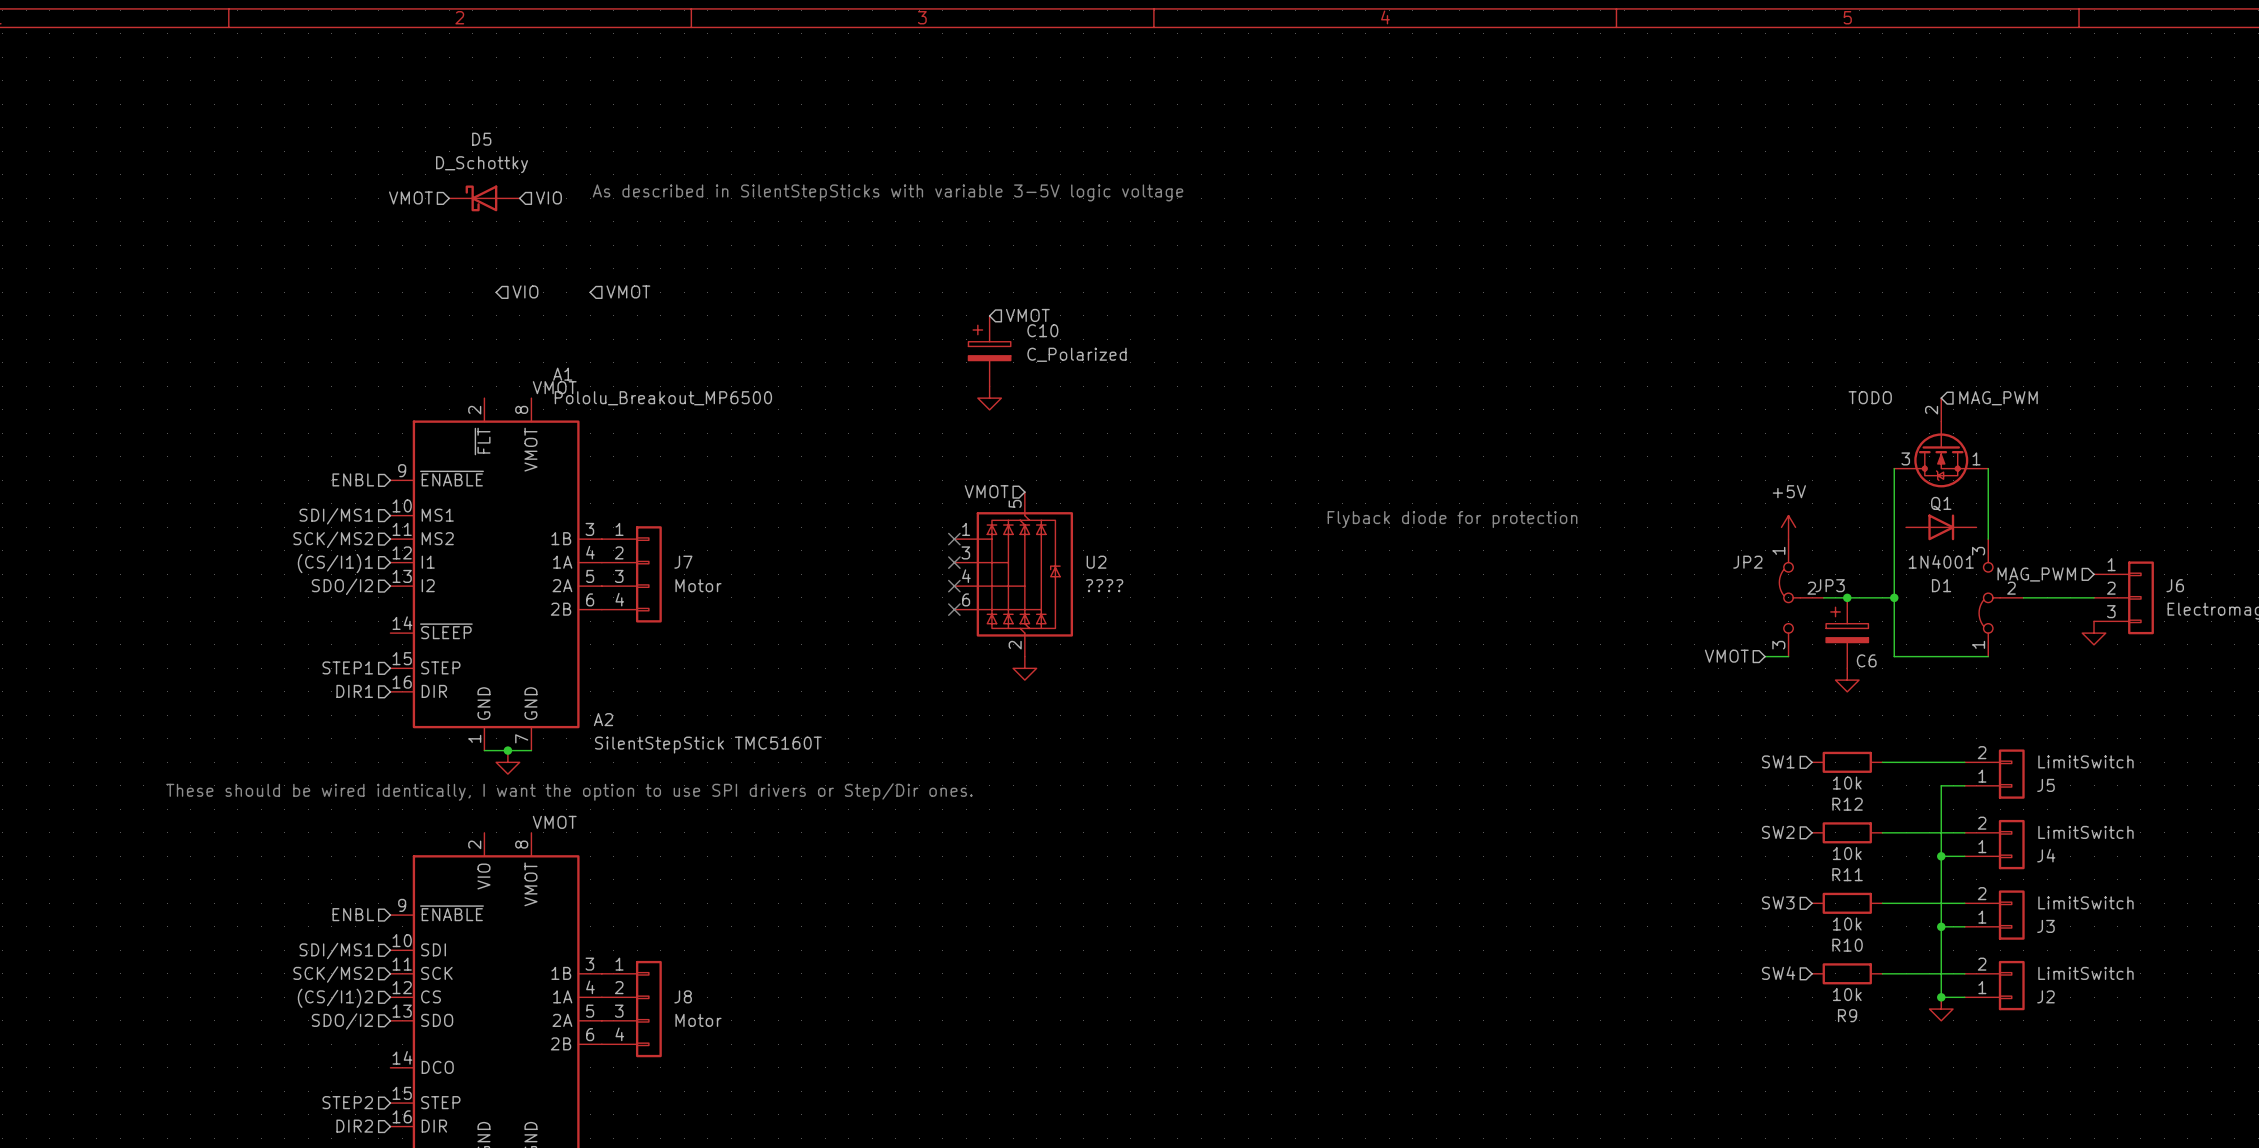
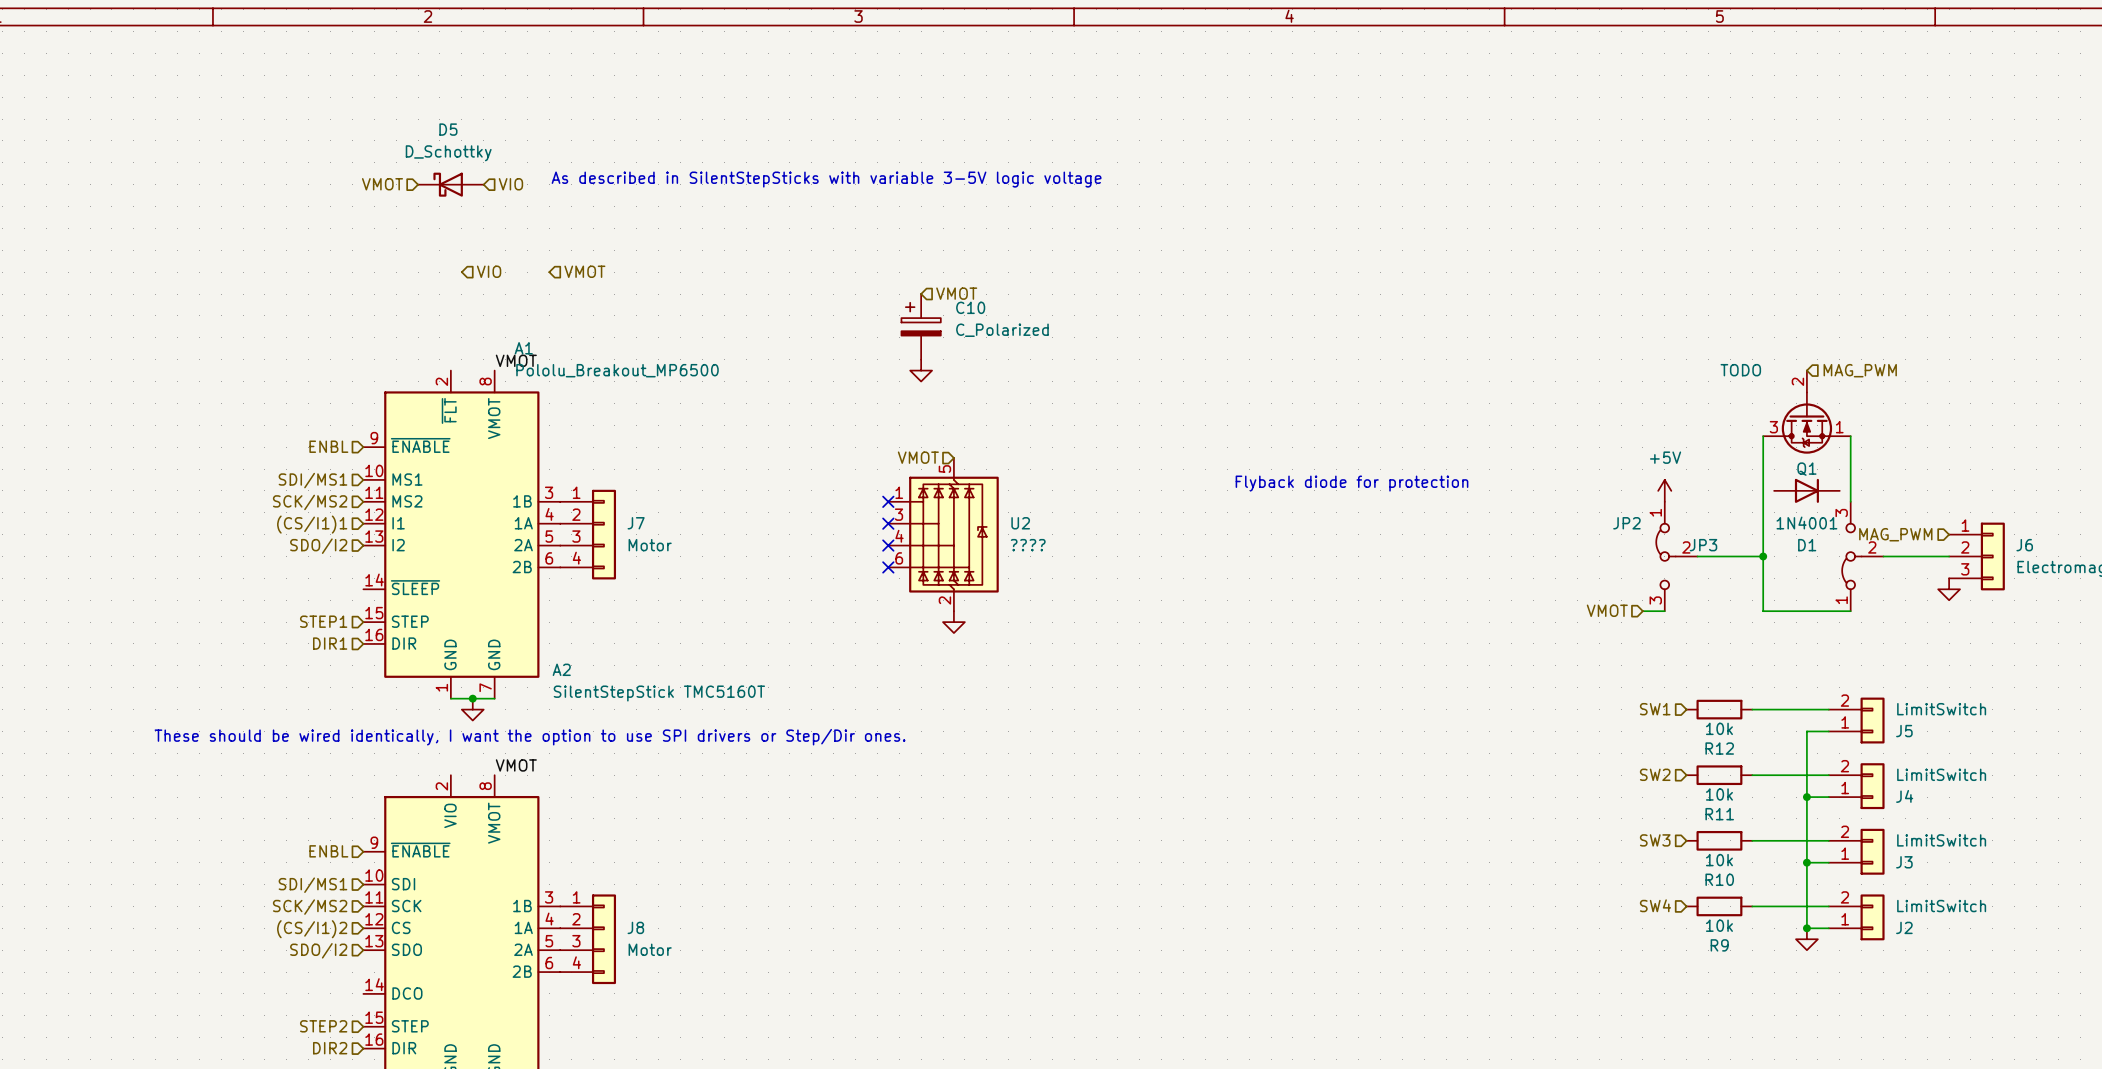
junction: (1847, 597) -> none
C6: (1847, 633) -> none
power symbol: (1847, 680) -> none

